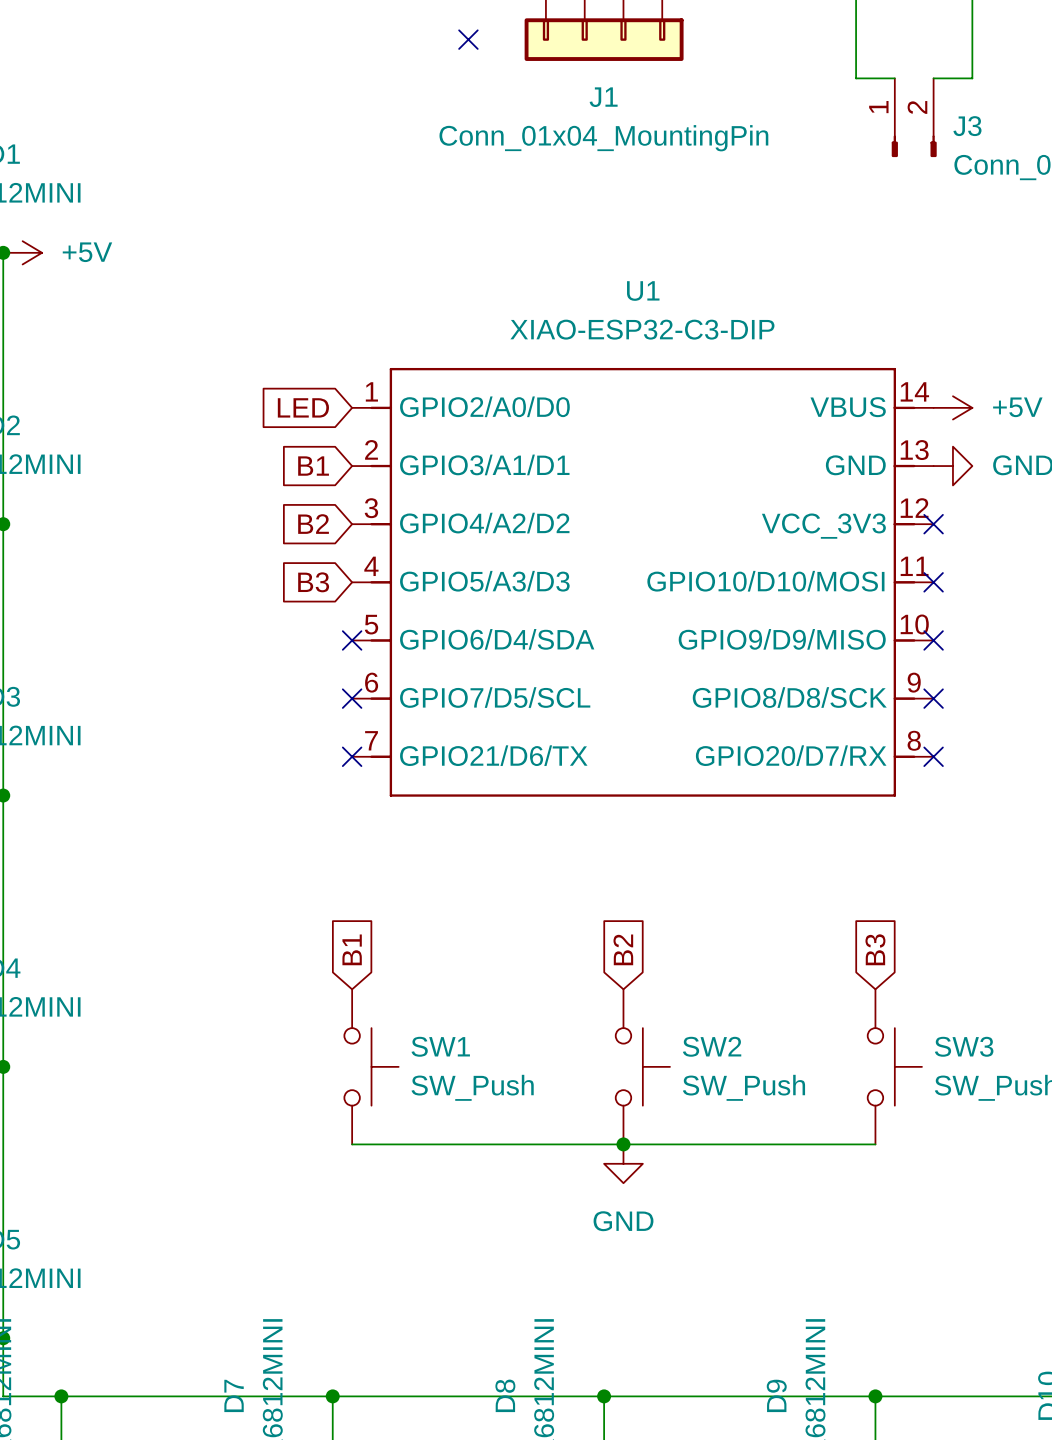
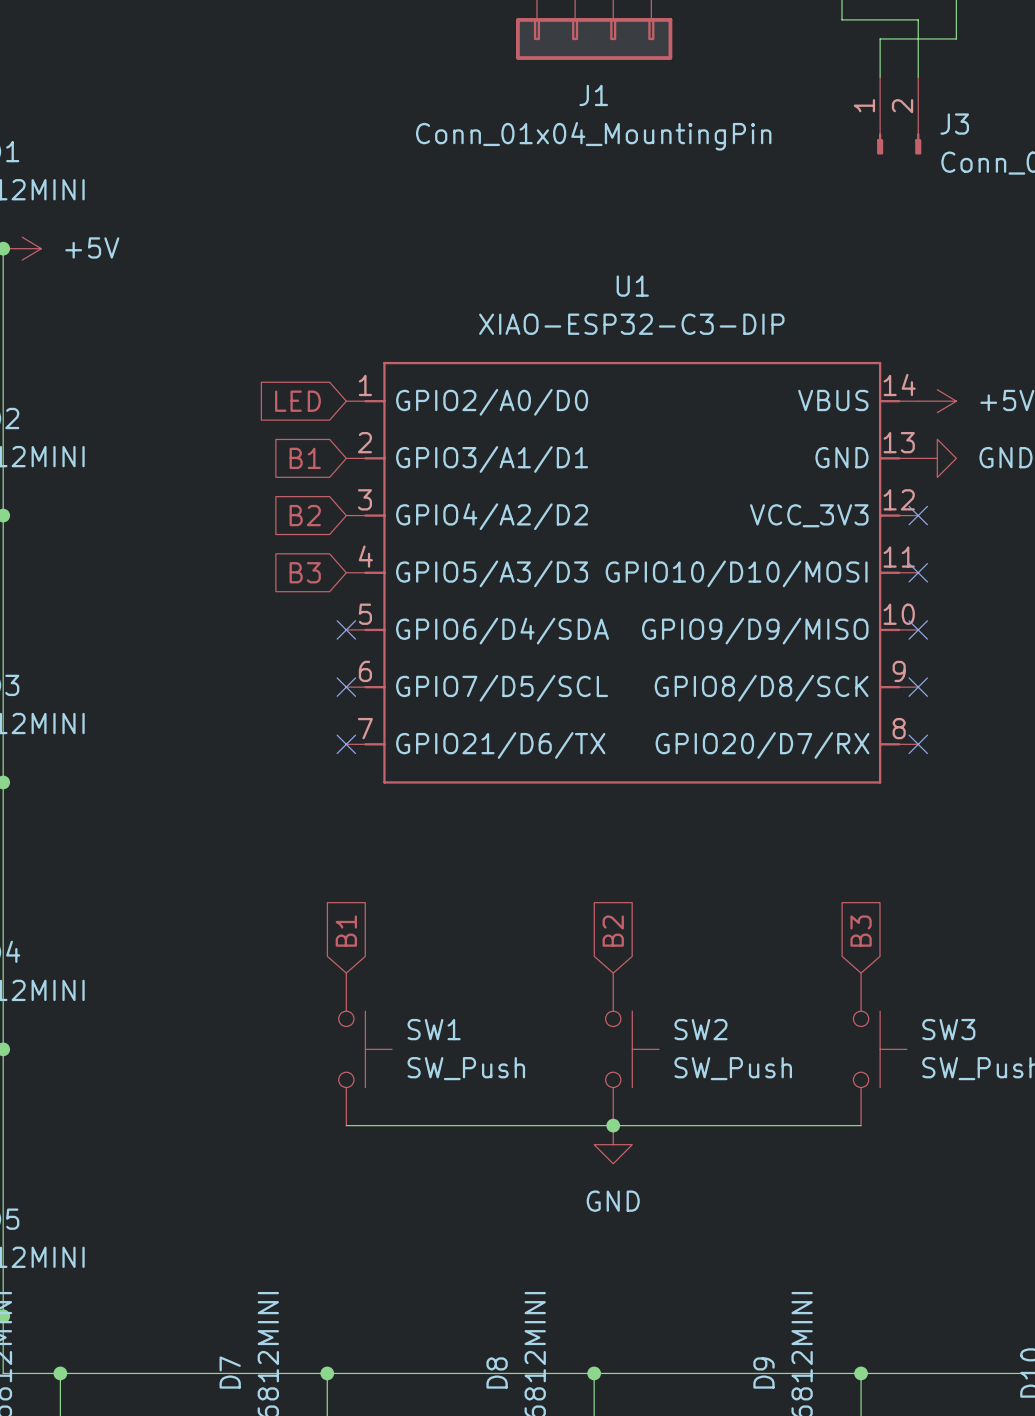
wire: (856, 20) (856, 78) (894, 78) -> (842, 19) (918, 19) (918, 77)
no-connect mark: (468, 39) -> none
wire: (972, 39) (972, 78) (933, 78) -> (956, 38) (880, 38) (880, 77)

